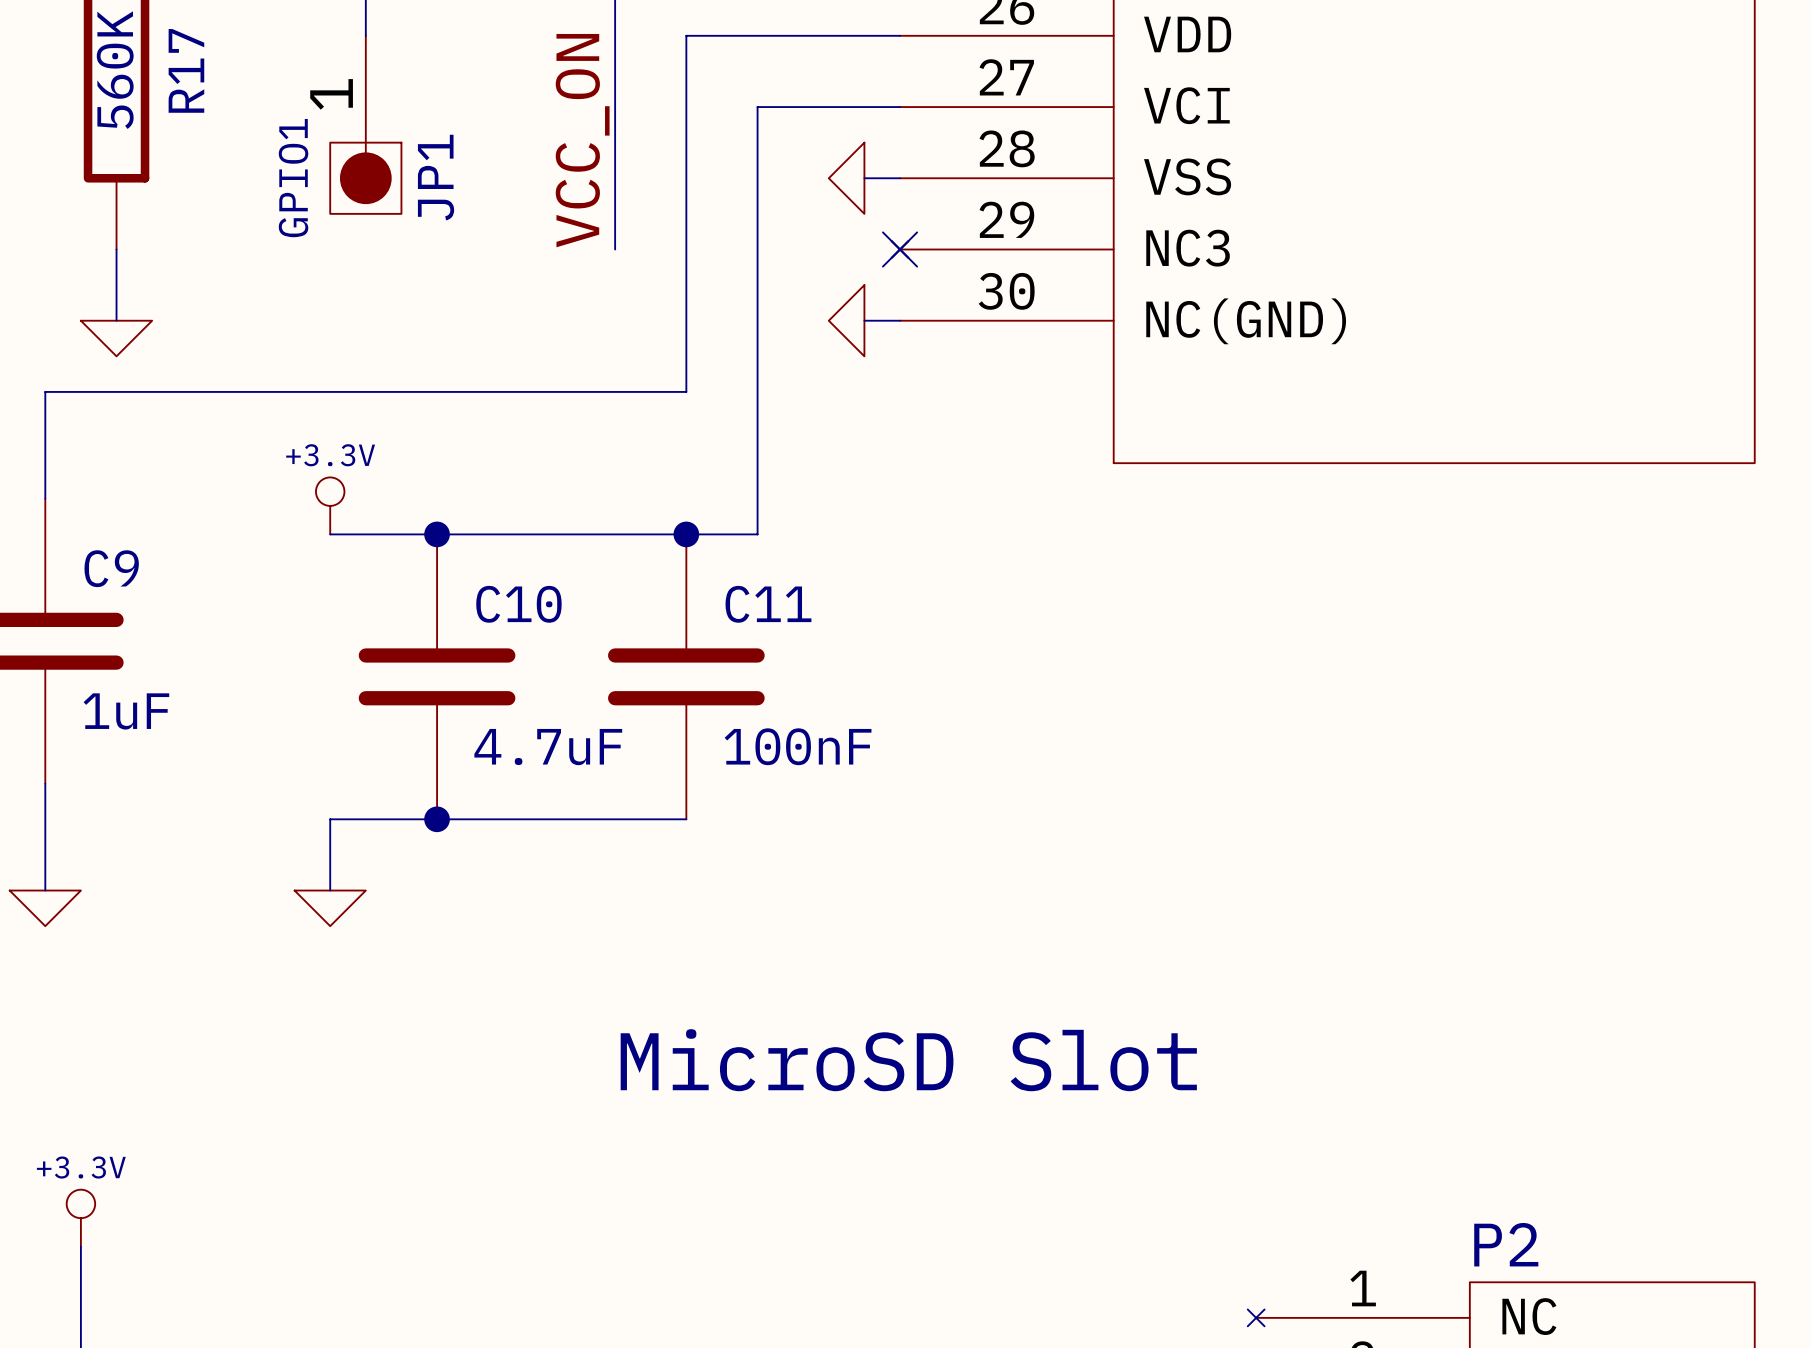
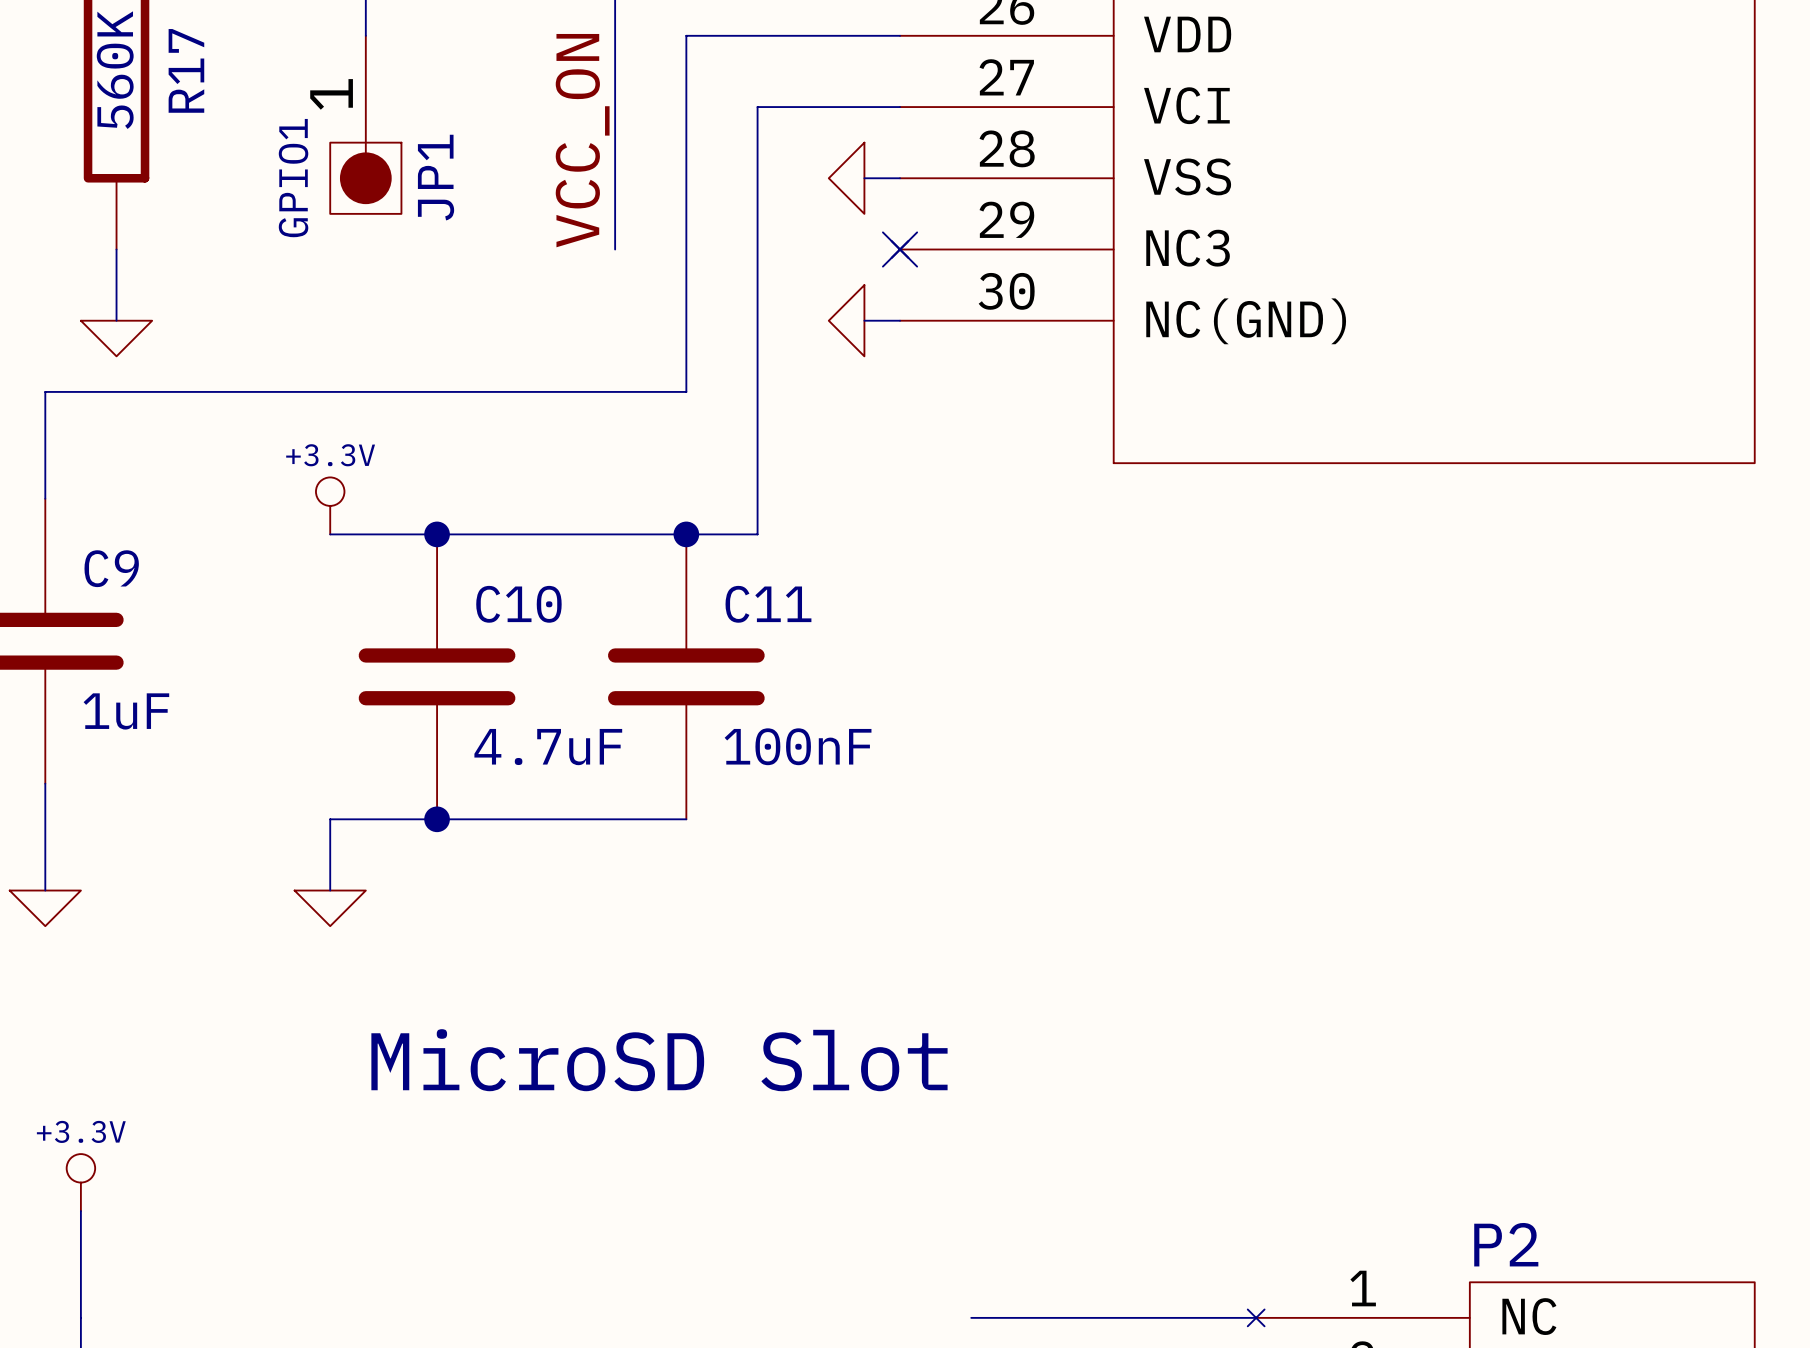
text position: MicroSD Slot (908, 1060) -> MicroSD Slot (659, 1060)
power symbol position: +3.3V (80, 1218) -> +3.3V (80, 1182)
wire: none -> (971, 1317) (1256, 1317)

